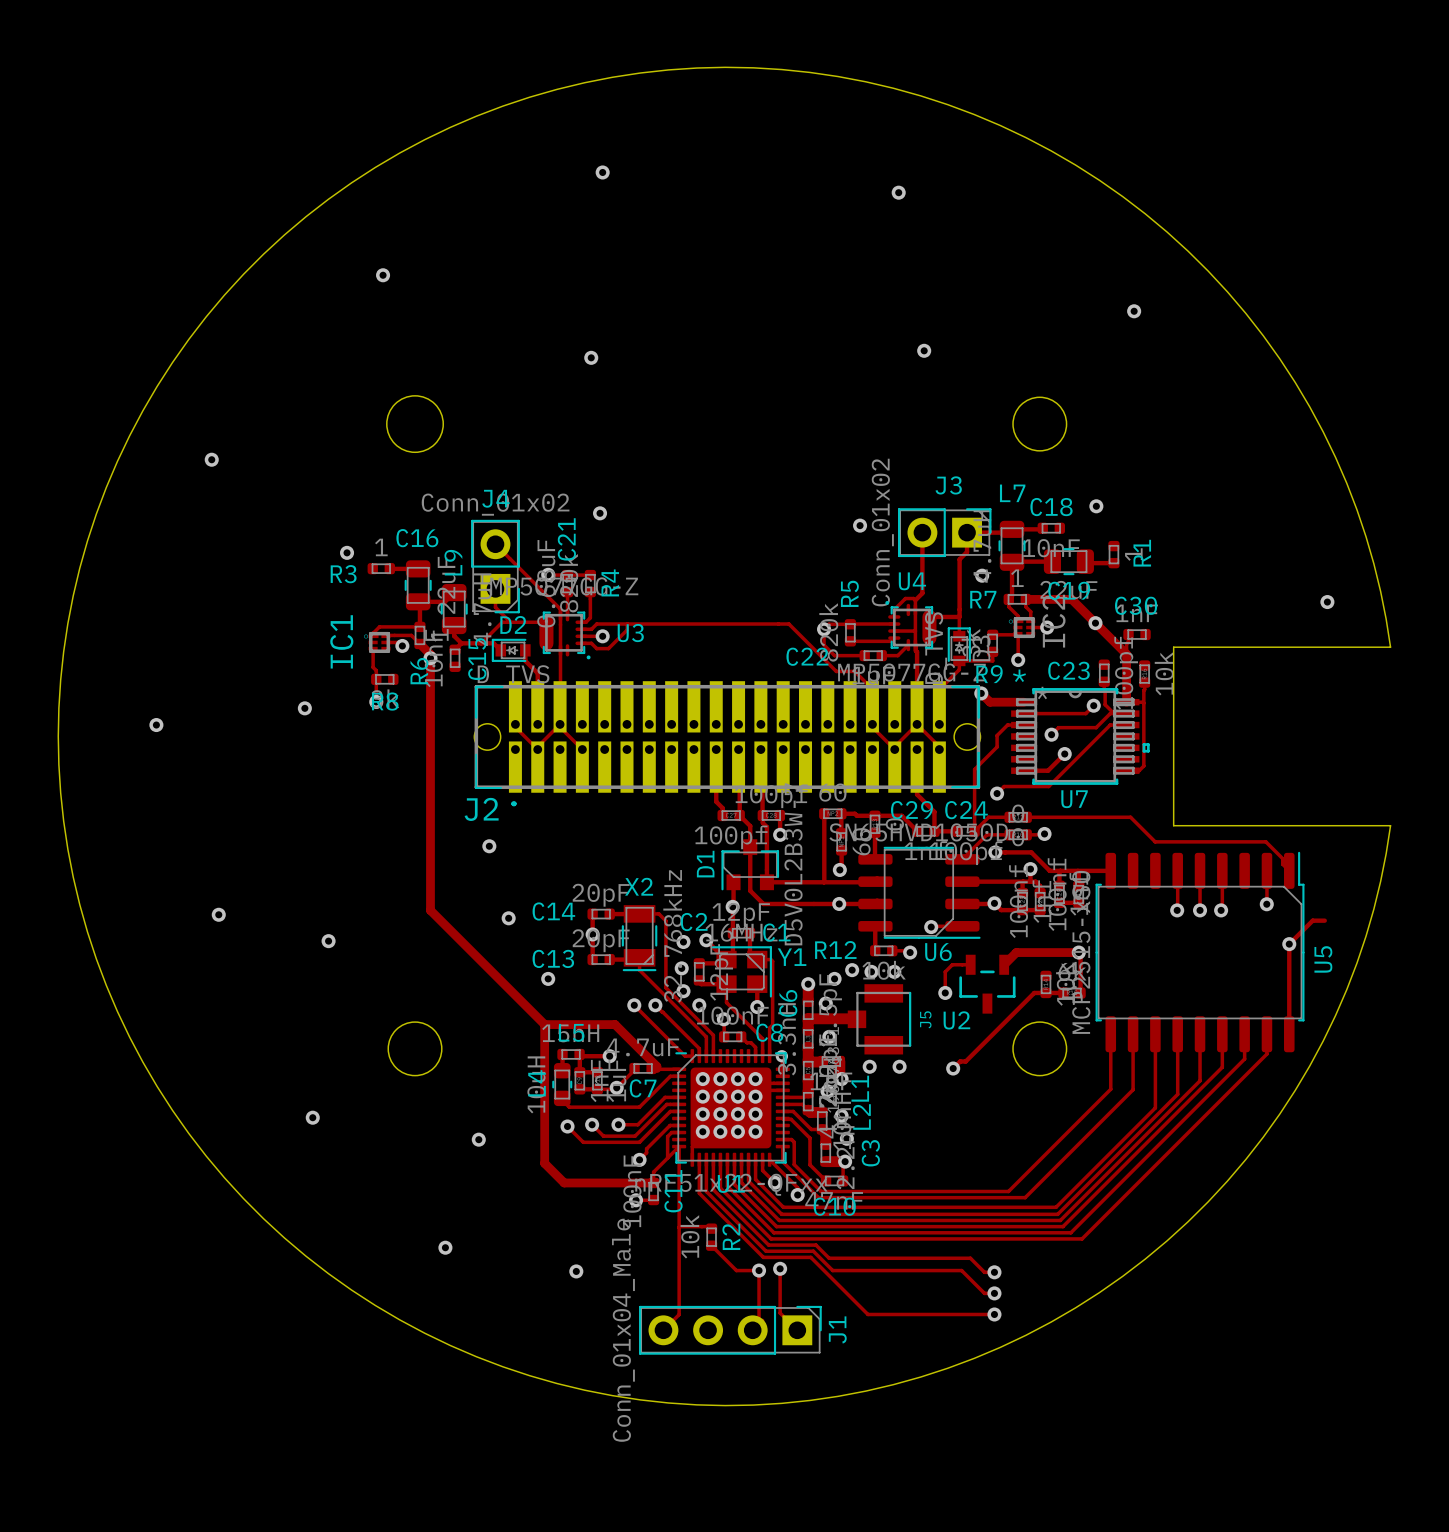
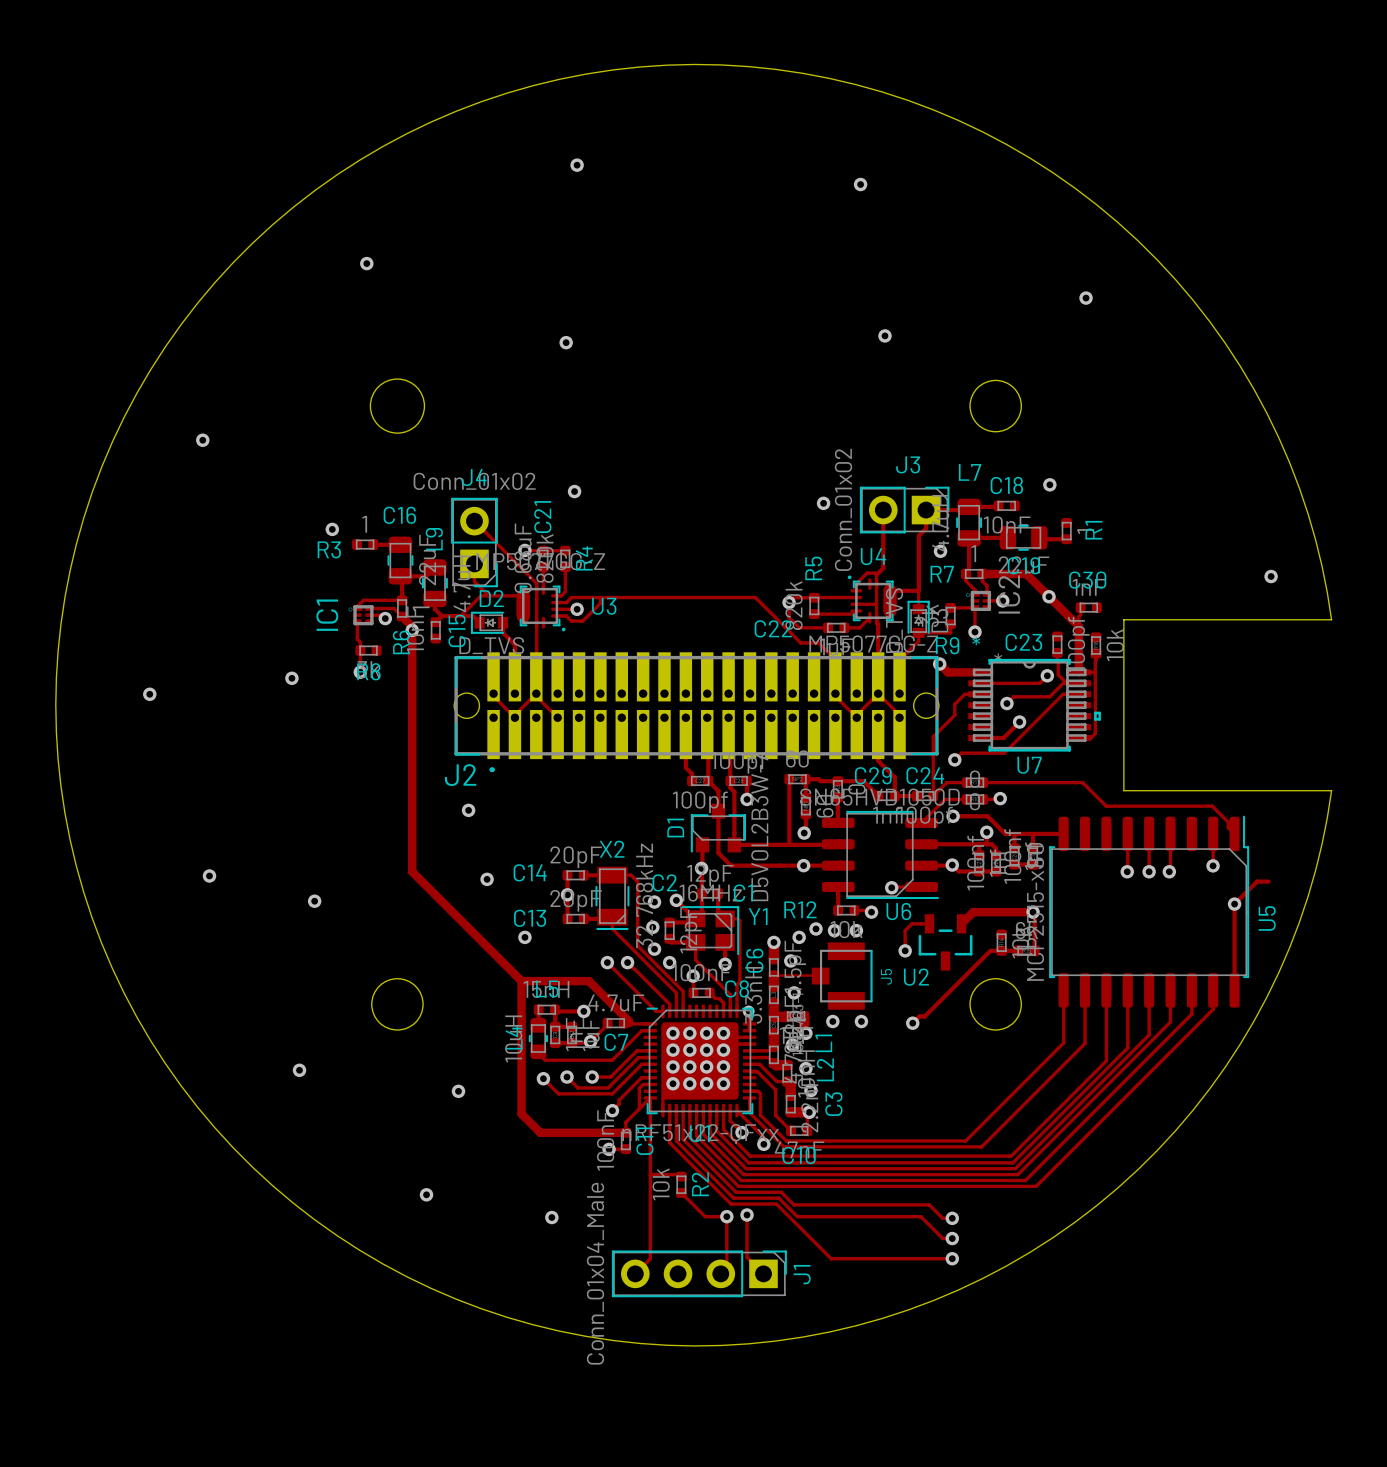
top track width: thick (808, 1018) (856, 1019) -> thin (773, 975) (820, 976)

